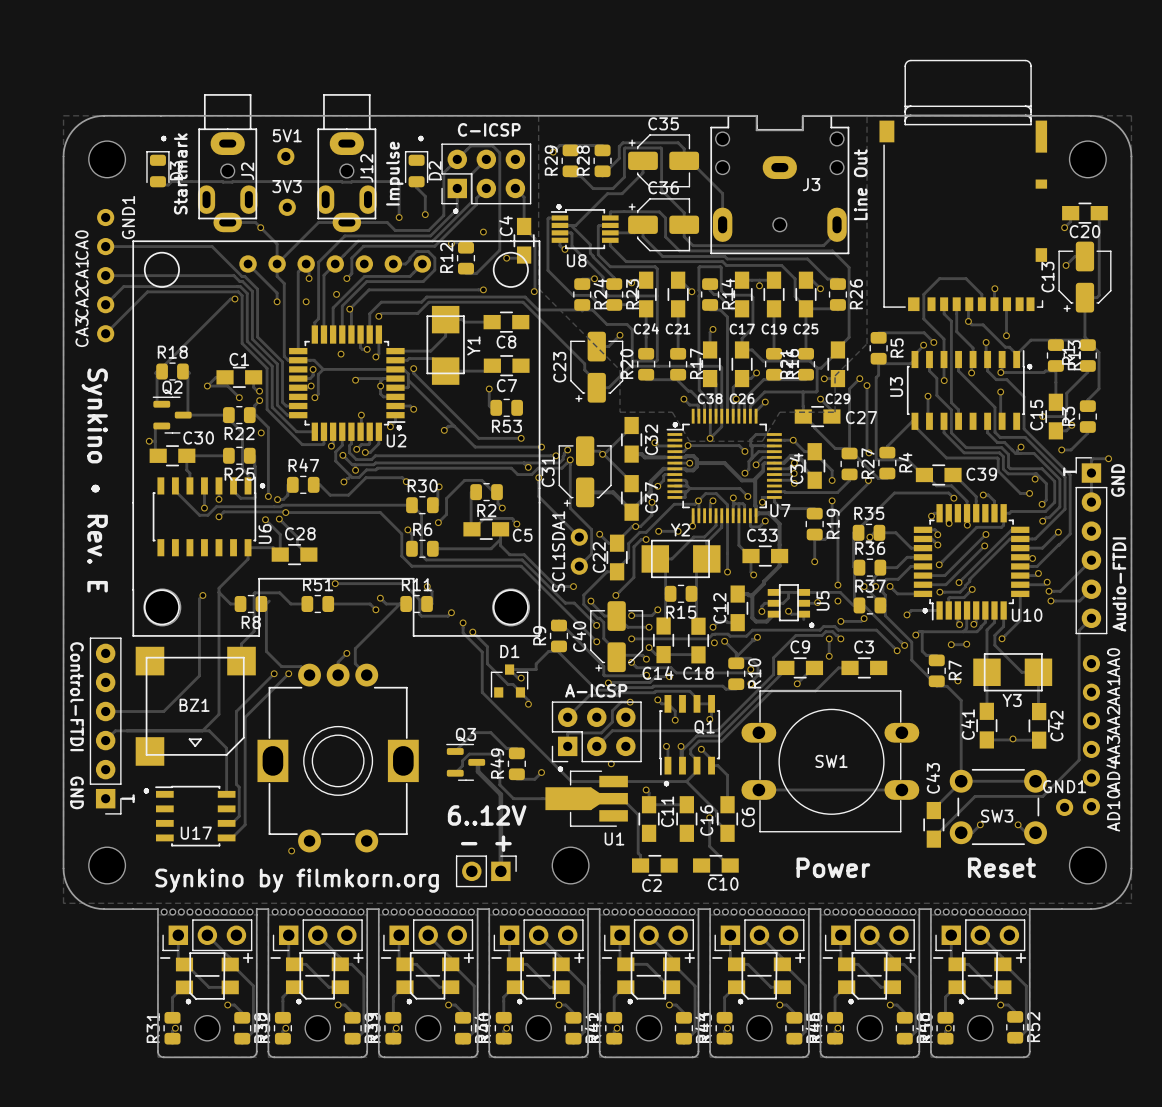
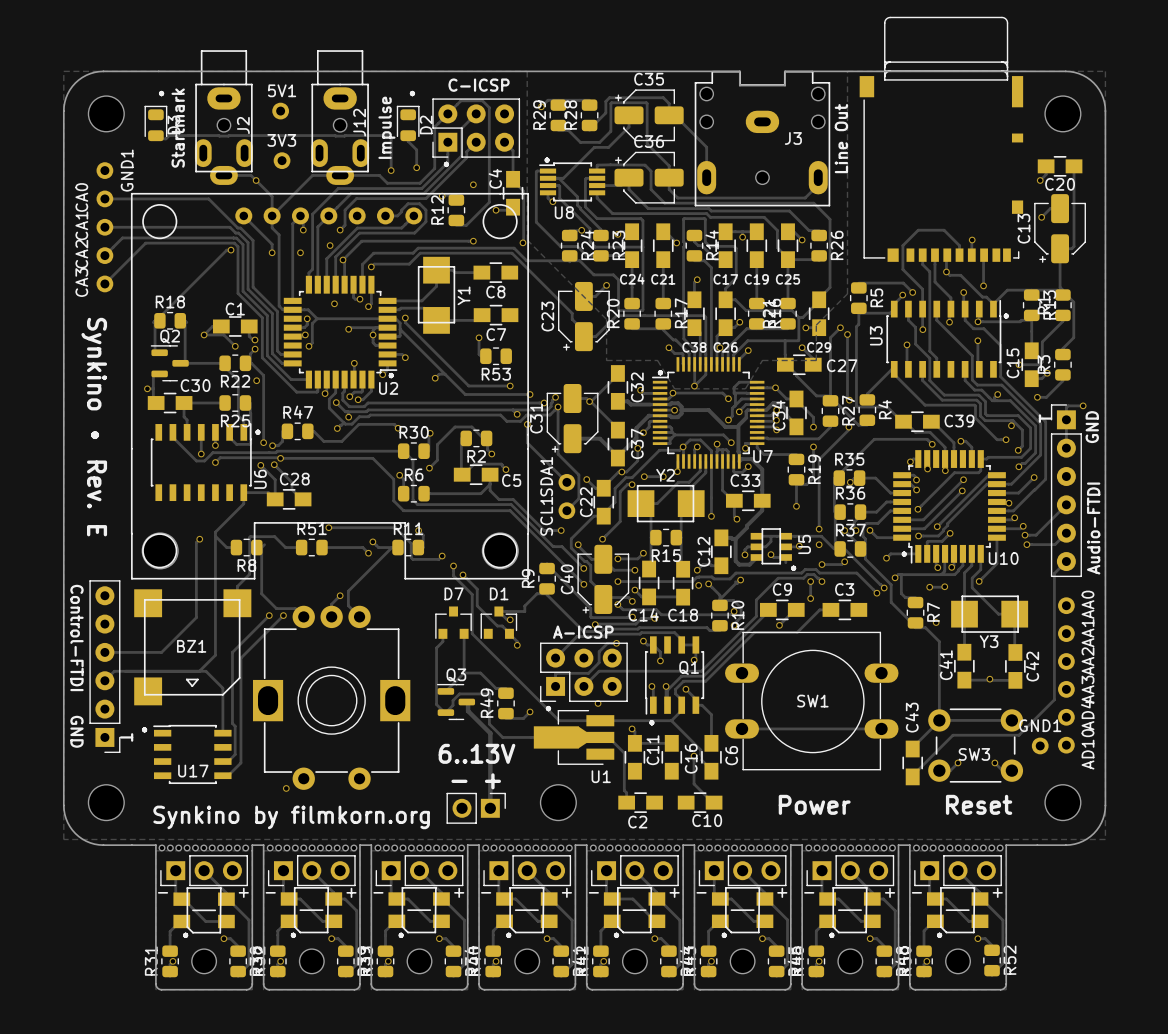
D7: none -> (453, 622)
track: none -> (442, 633) (442, 641) (436, 648) (436, 704) (444, 712)
track: none -> (464, 633) (464, 673)
text: 6..12V (487, 815) -> 6..13V (477, 753)

